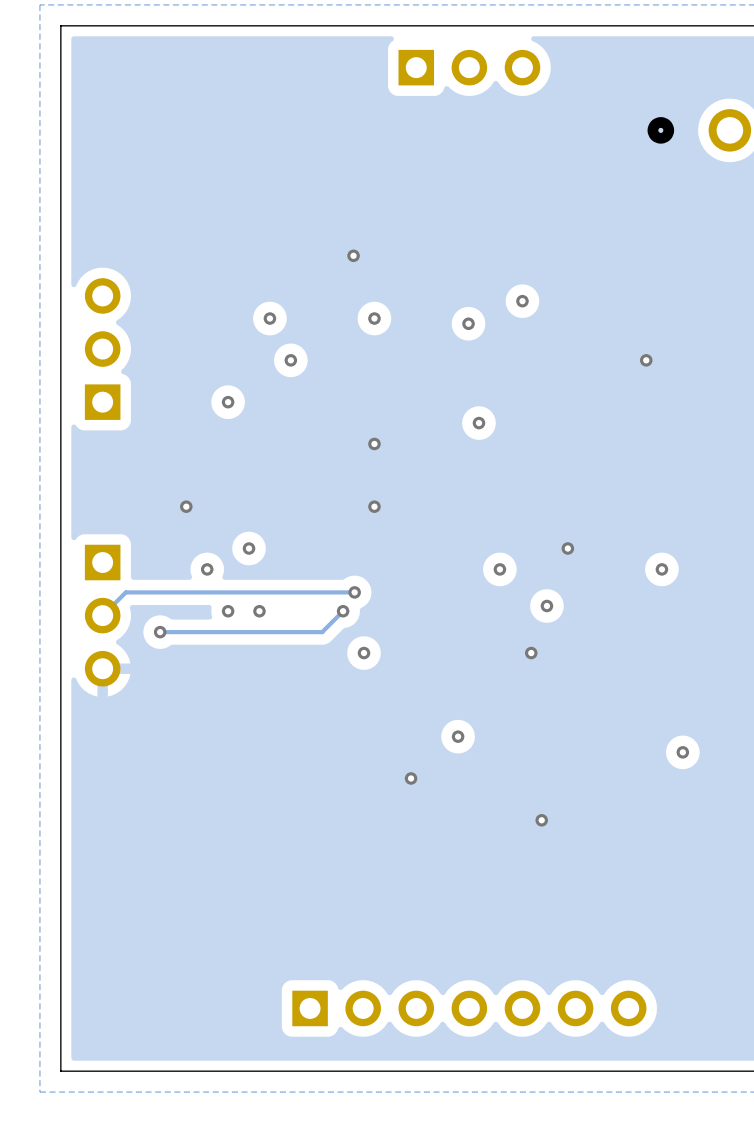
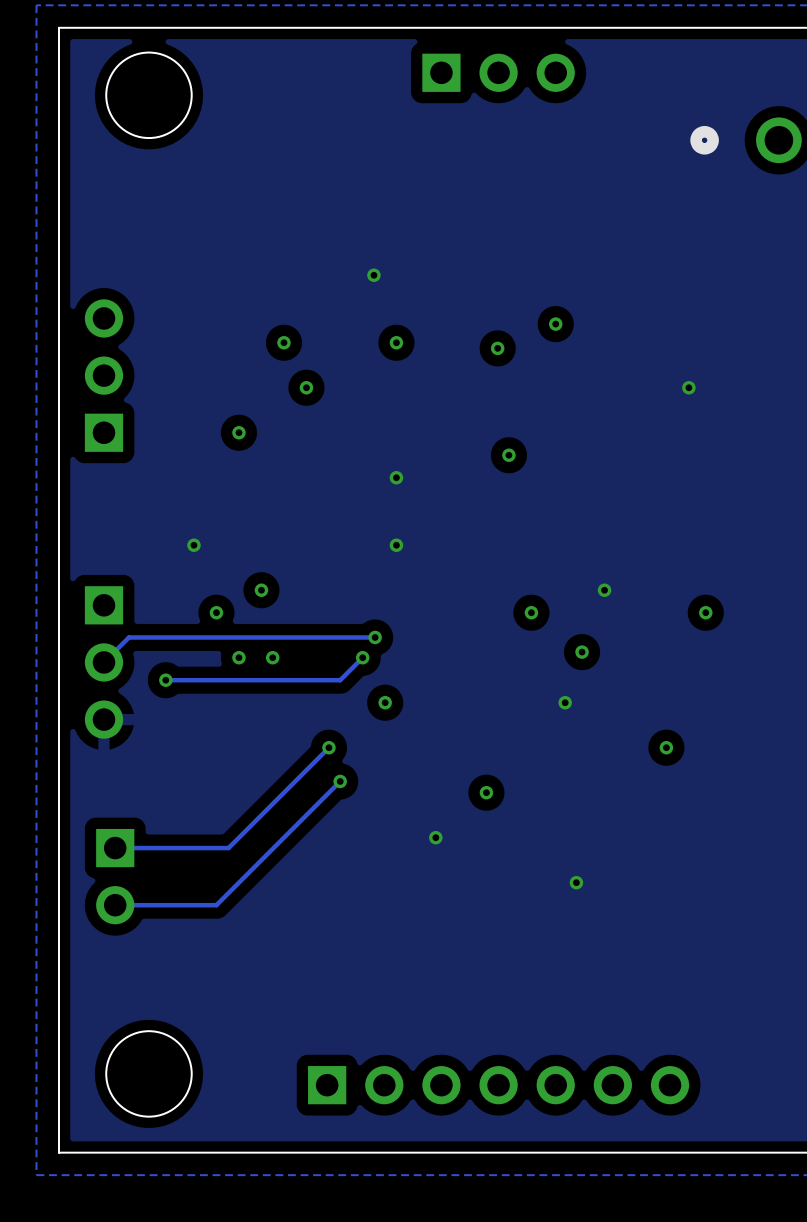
round board edge: none -> [105, 51, 193, 139]
track: none -> (328, 747) (228, 848) (115, 848)
via: none -> (328, 747)
track: none -> (340, 781) (216, 905) (115, 905)
via: none -> (340, 781)
via position: (682, 752) -> (666, 747)
part: none -> (115, 876)
round board edge: none -> [105, 1030, 193, 1118]

